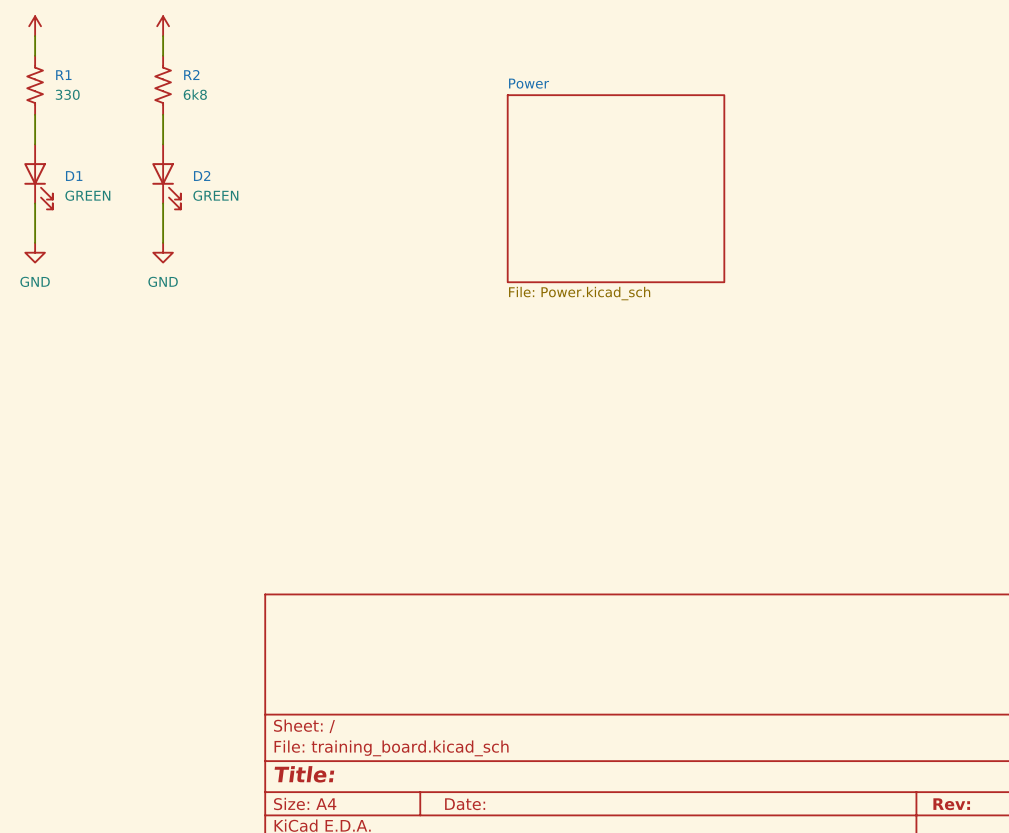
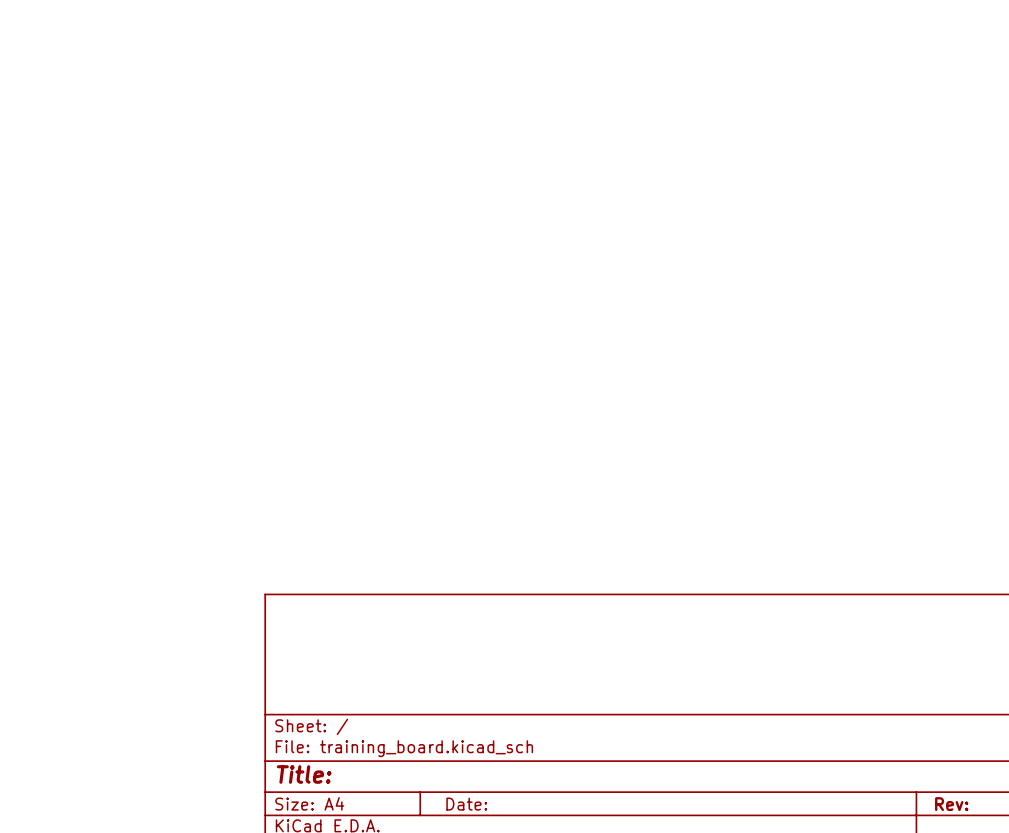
power symbol: (35, 26) -> none
power symbol: (163, 26) -> none
wire: (35, 36) (35, 55) -> none
wire: (163, 36) (163, 55) -> none
R1: 330 (35, 85) -> none
R2: 6k8 (163, 85) -> none
wire: (35, 114) (35, 144) -> none
wire: (163, 114) (163, 144) -> none
D1: GREEN (38, 176) -> none
D2: GREEN (166, 176) -> none
sheet Power: File: Power.kicad_sch (616, 188) -> none
wire: (35, 203) (35, 242) -> none
wire: (163, 203) (163, 242) -> none
power symbol: GND (35, 252) -> none
power symbol: GND (163, 252) -> none

